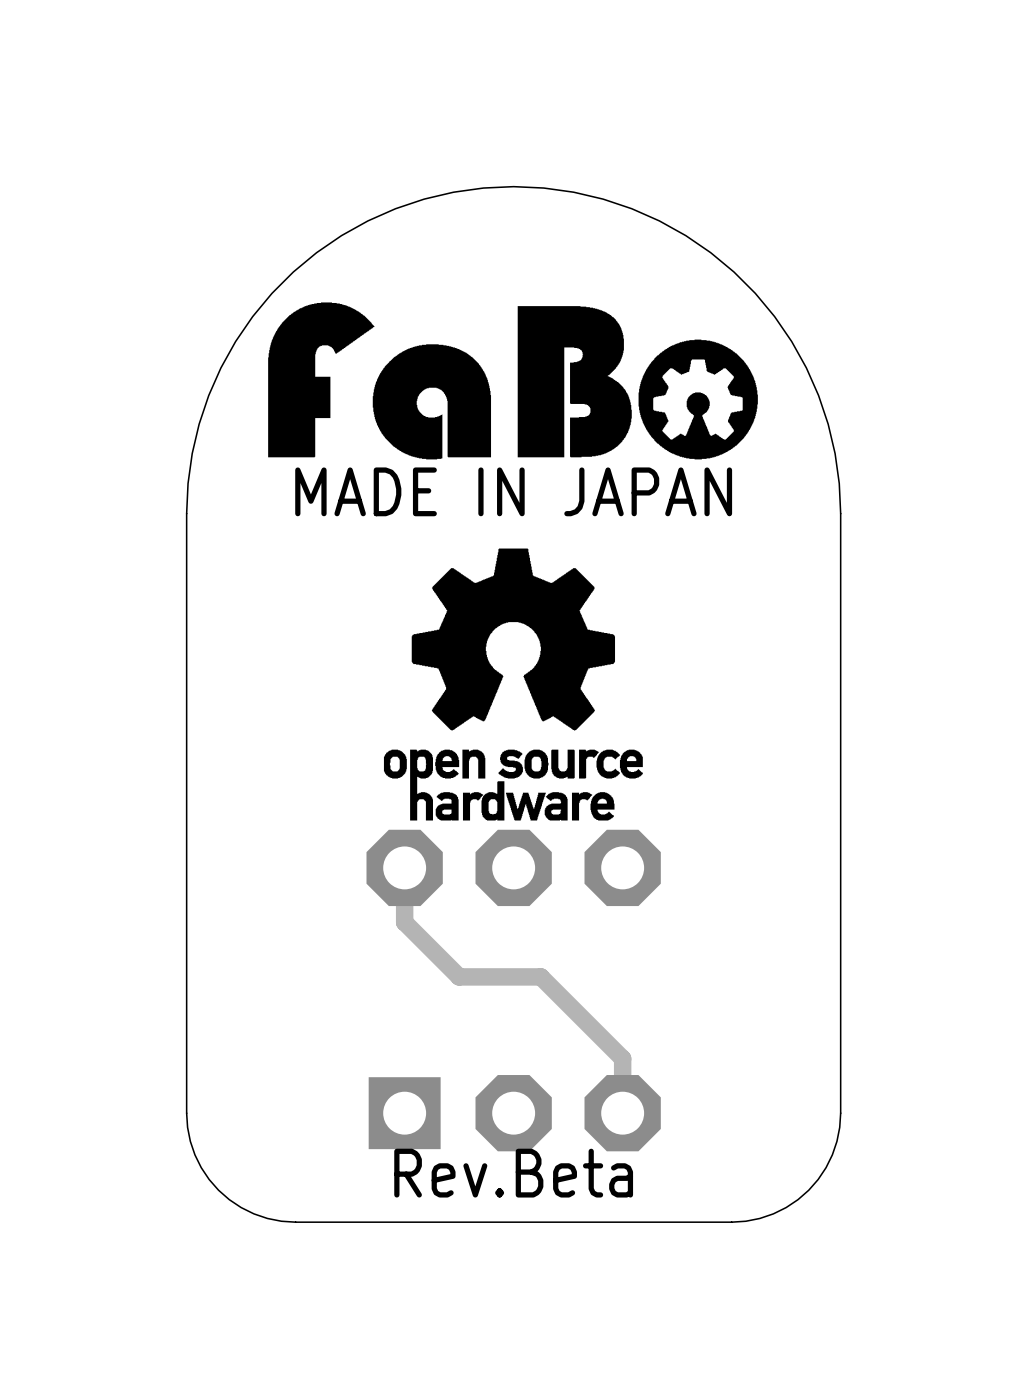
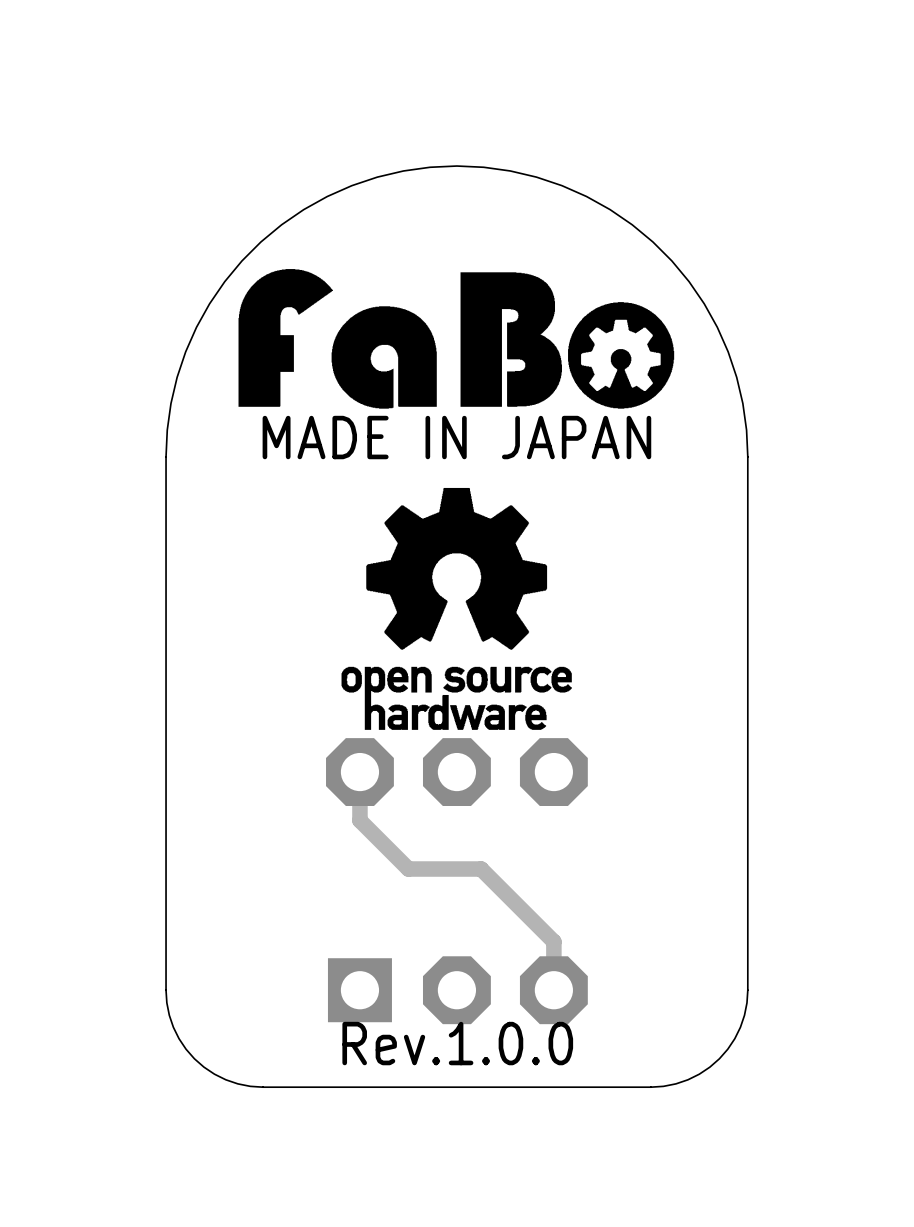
text: Rev.Beta (513, 1173) -> Rev.1.0.0 (457, 1043)

